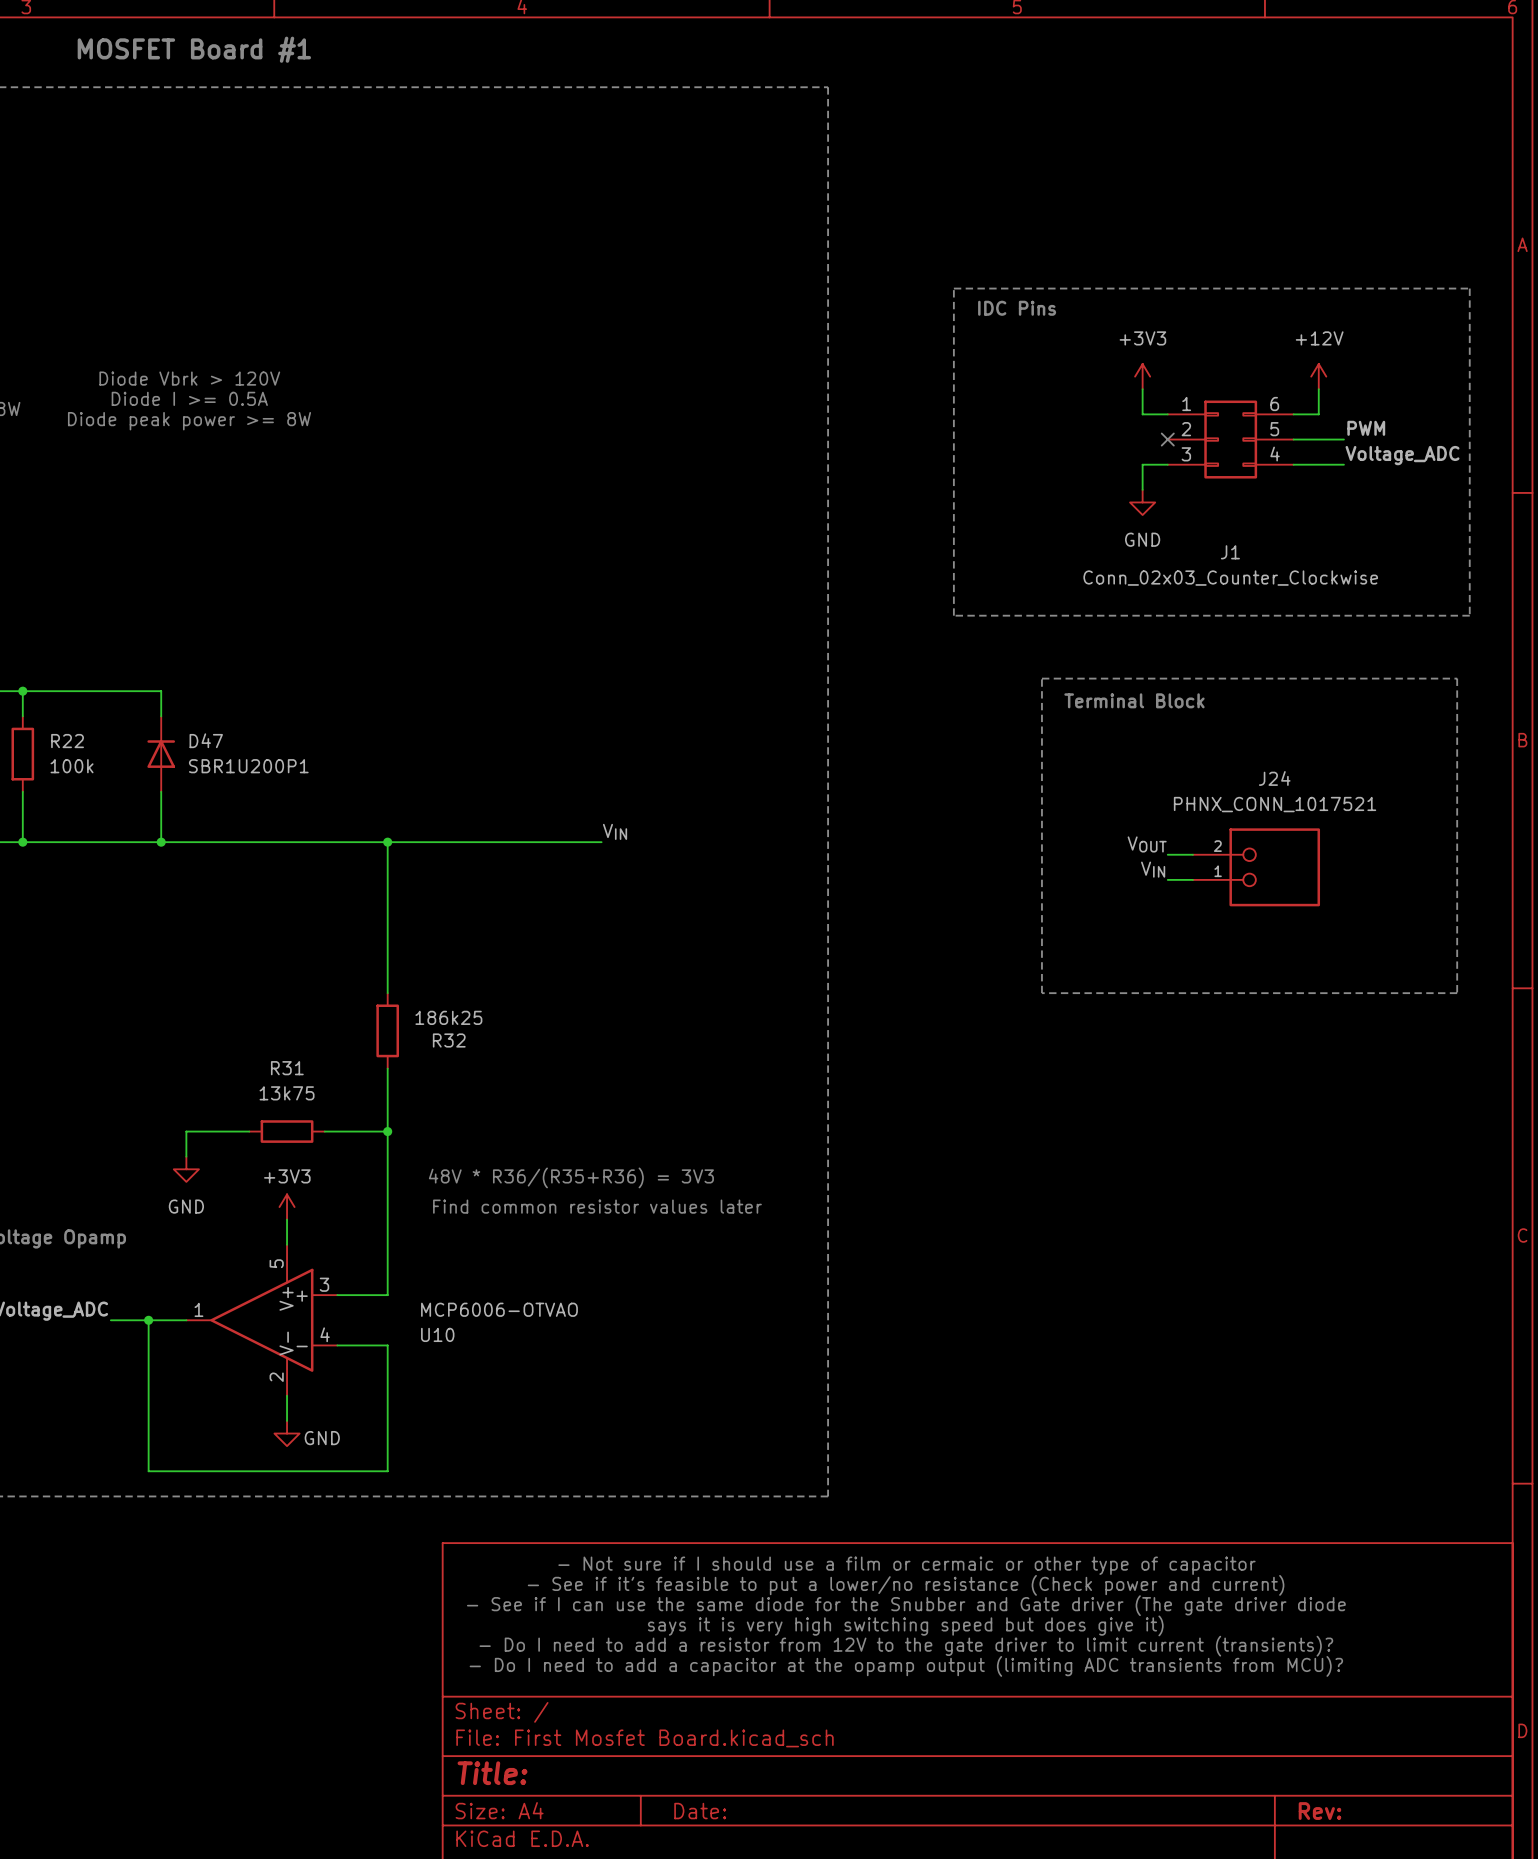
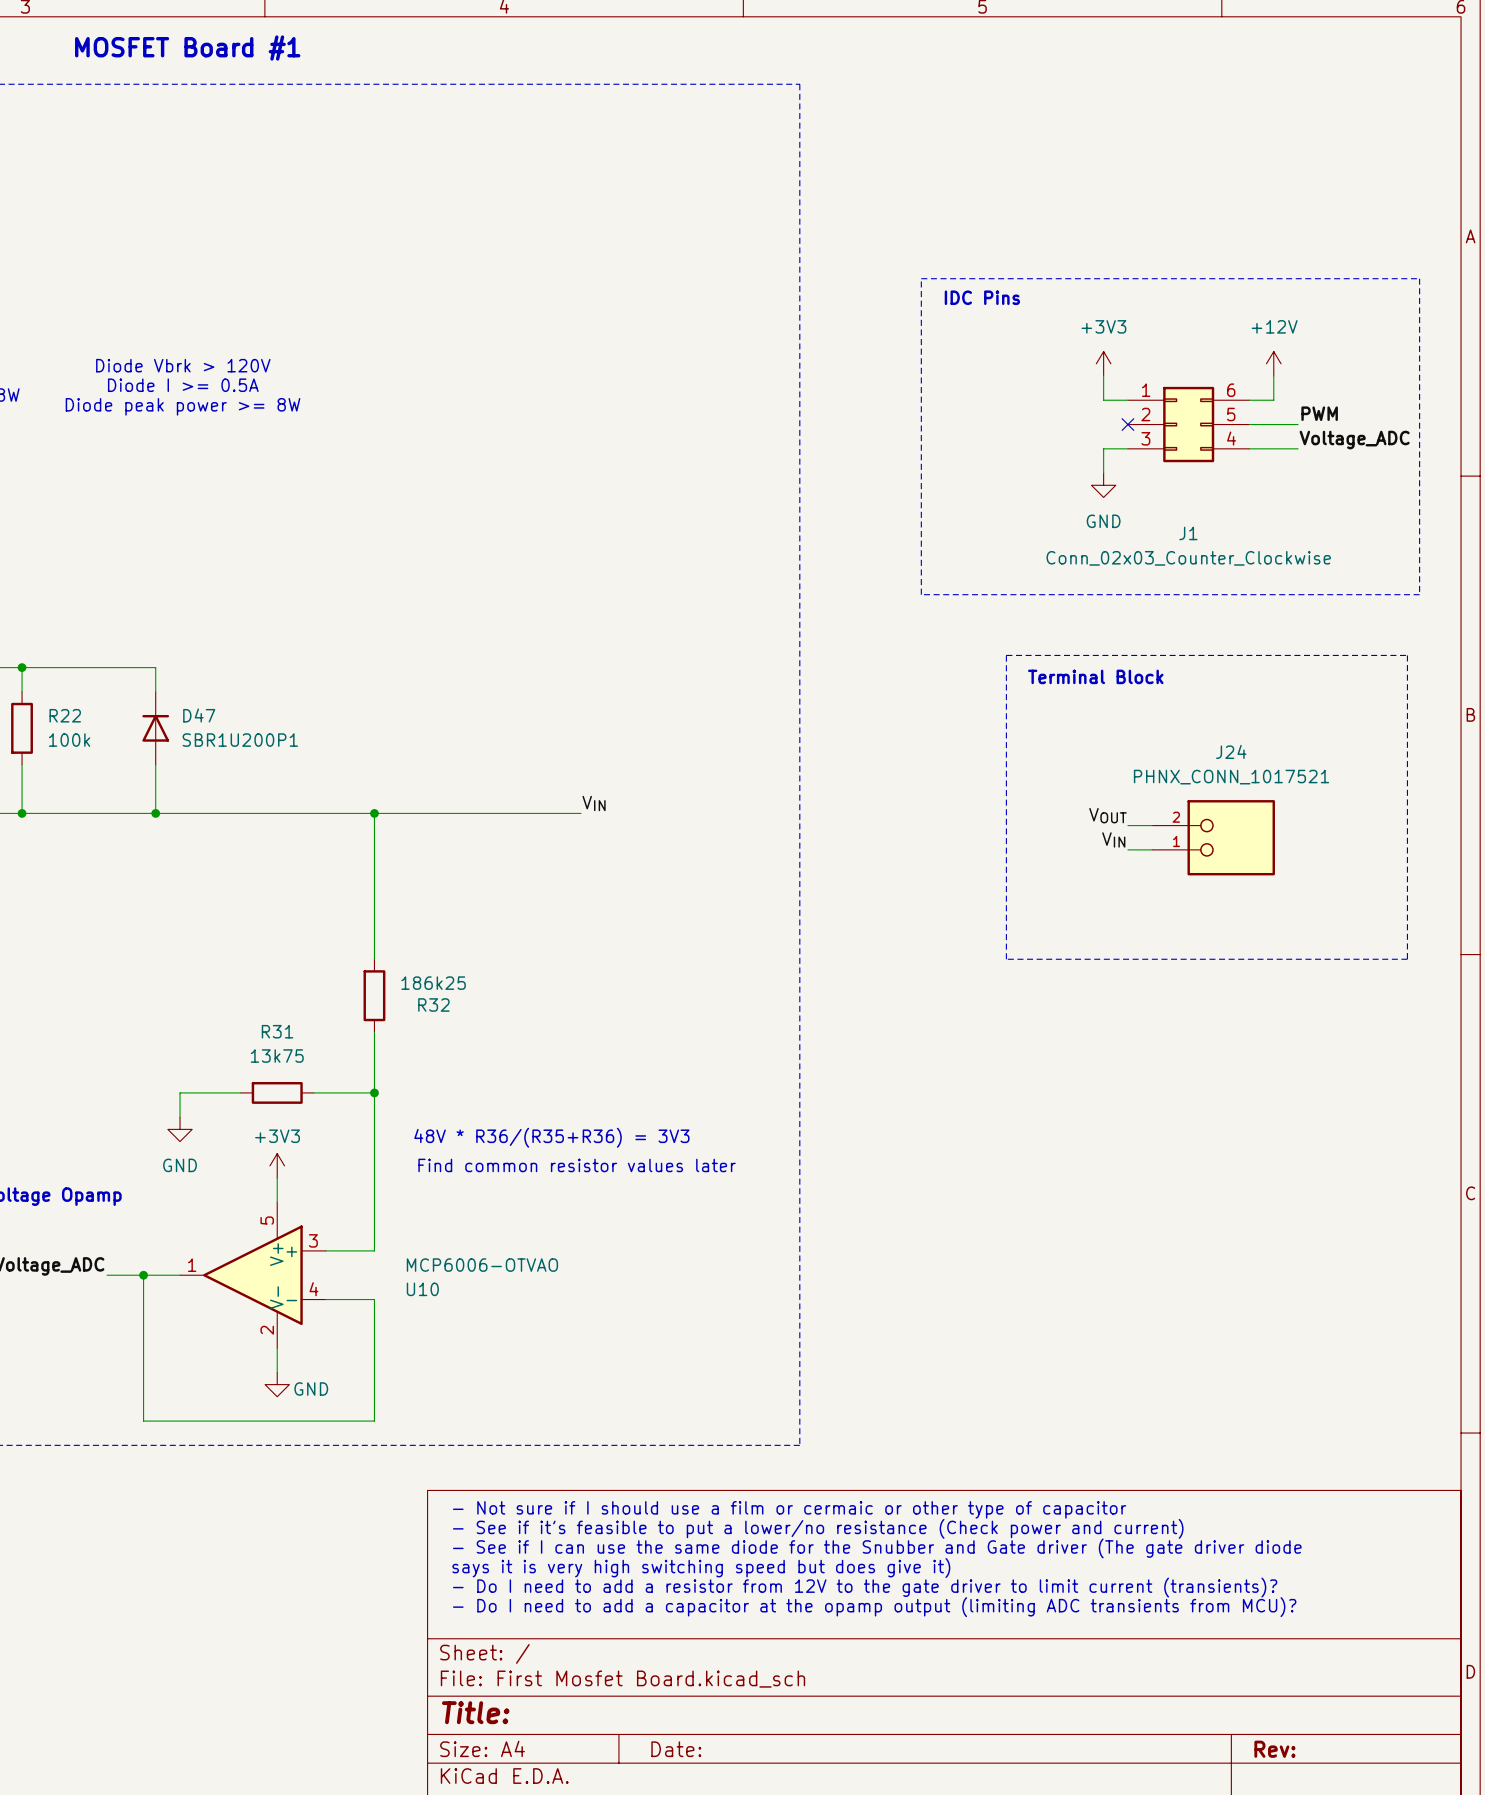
text: none -> - Not sure if I should use a film or cermaic or other type of capacitor (789, 1509)
text: - Not sure if I should use a film or cermaic or other type of capacitor (906, 1565) -> none
text: none -> - See if it's feasible to put a lower/no resistance (Check power and current) (818, 1528)
text: - See if it's feasible to put a lower/no resistance (Check power and current) (906, 1585) -> none
text: none -> - See if I can use the same diode for the Snubber and Gate driver (The gate driver diode (877, 1548)
text: - See if I can use the same diode for the Snubber and Gate driver (The gate driver diode (906, 1605) -> none
text: none -> says it is very high switching speed but does give it) (701, 1567)
text: says it is very high switching speed but does give it) (905, 1625) -> none
text: none -> - Do I need to add a resistor from 12V to the gate driver to limit current (transients)? (865, 1587)
text: - Do I need to add a resistor from 12V to the gate driver to limit current (transients)? (906, 1646) -> none
text: none -> - Do I need to add a capacitor at the opamp output (limiting ADC transients from MCU)? (874, 1607)
text: - Do I need to add a capacitor at the opamp output (limiting ADC transients from MCU)? (906, 1666) -> none

